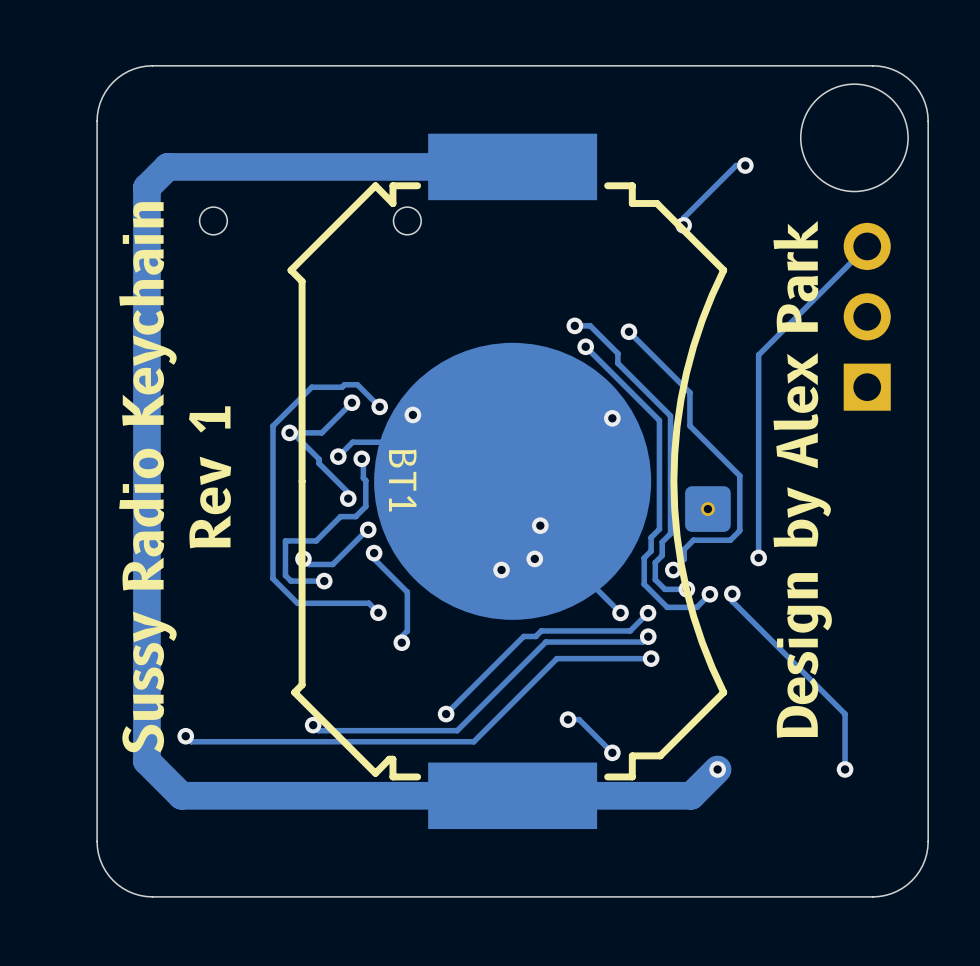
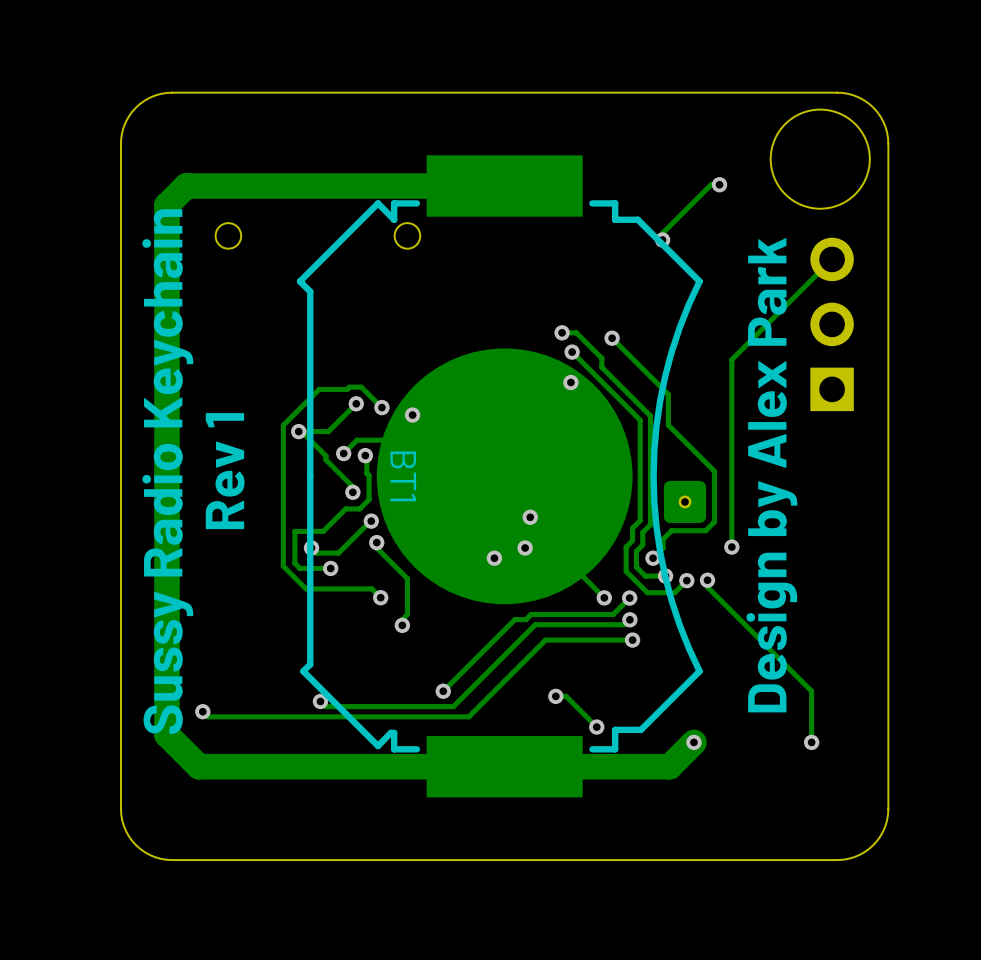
via position: (612, 418) -> (570, 382)

